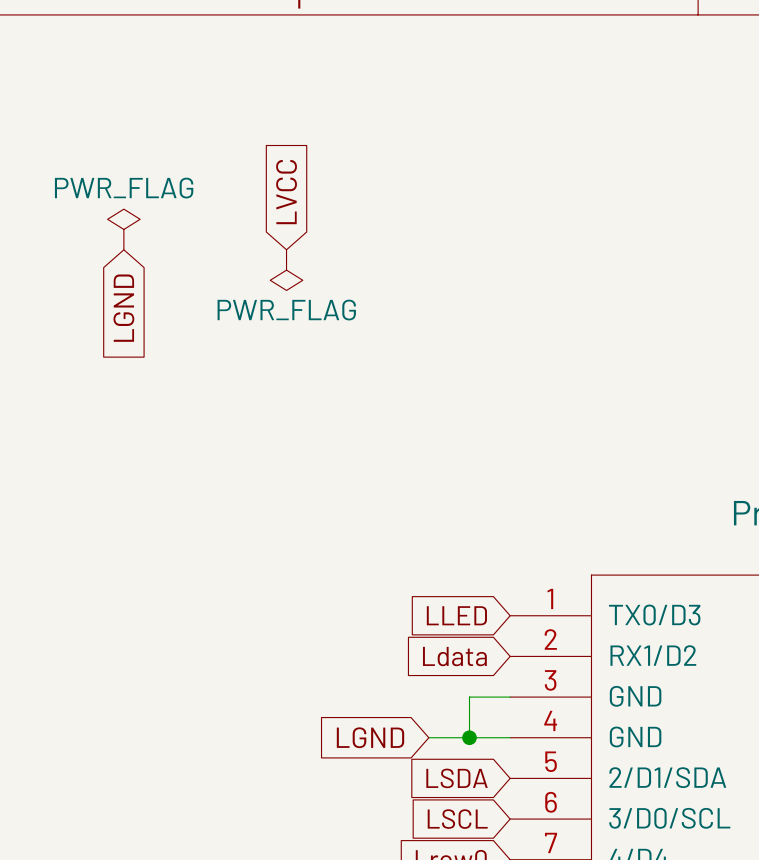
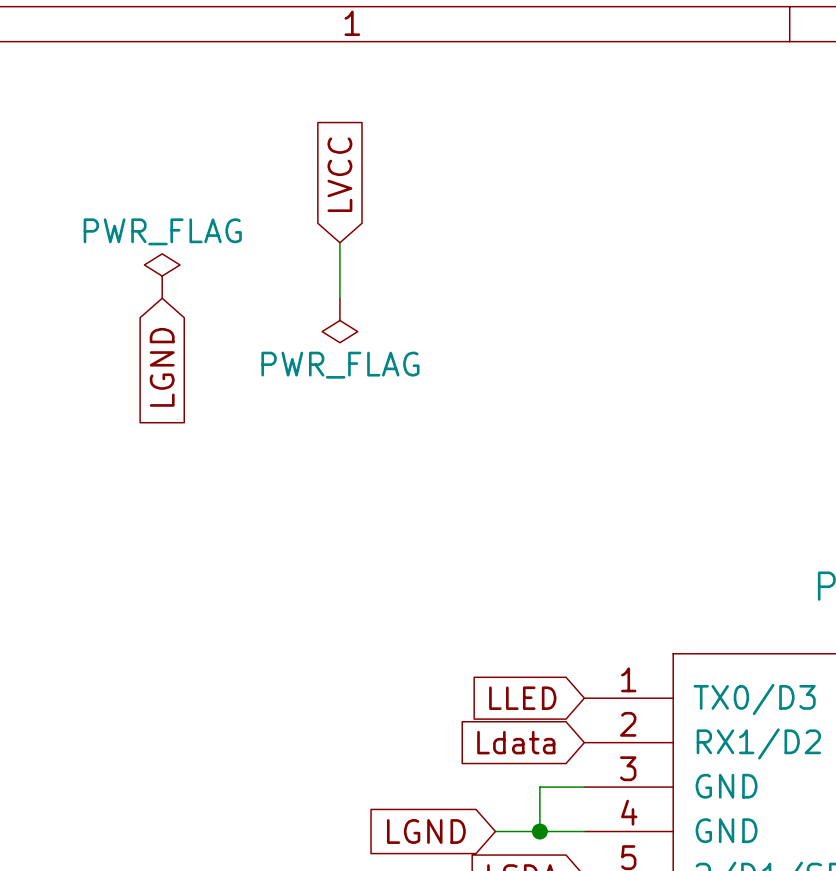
global label position: LVCC (286, 192) -> LVCC (339, 174)
wire: none -> (339, 242) (339, 298)

